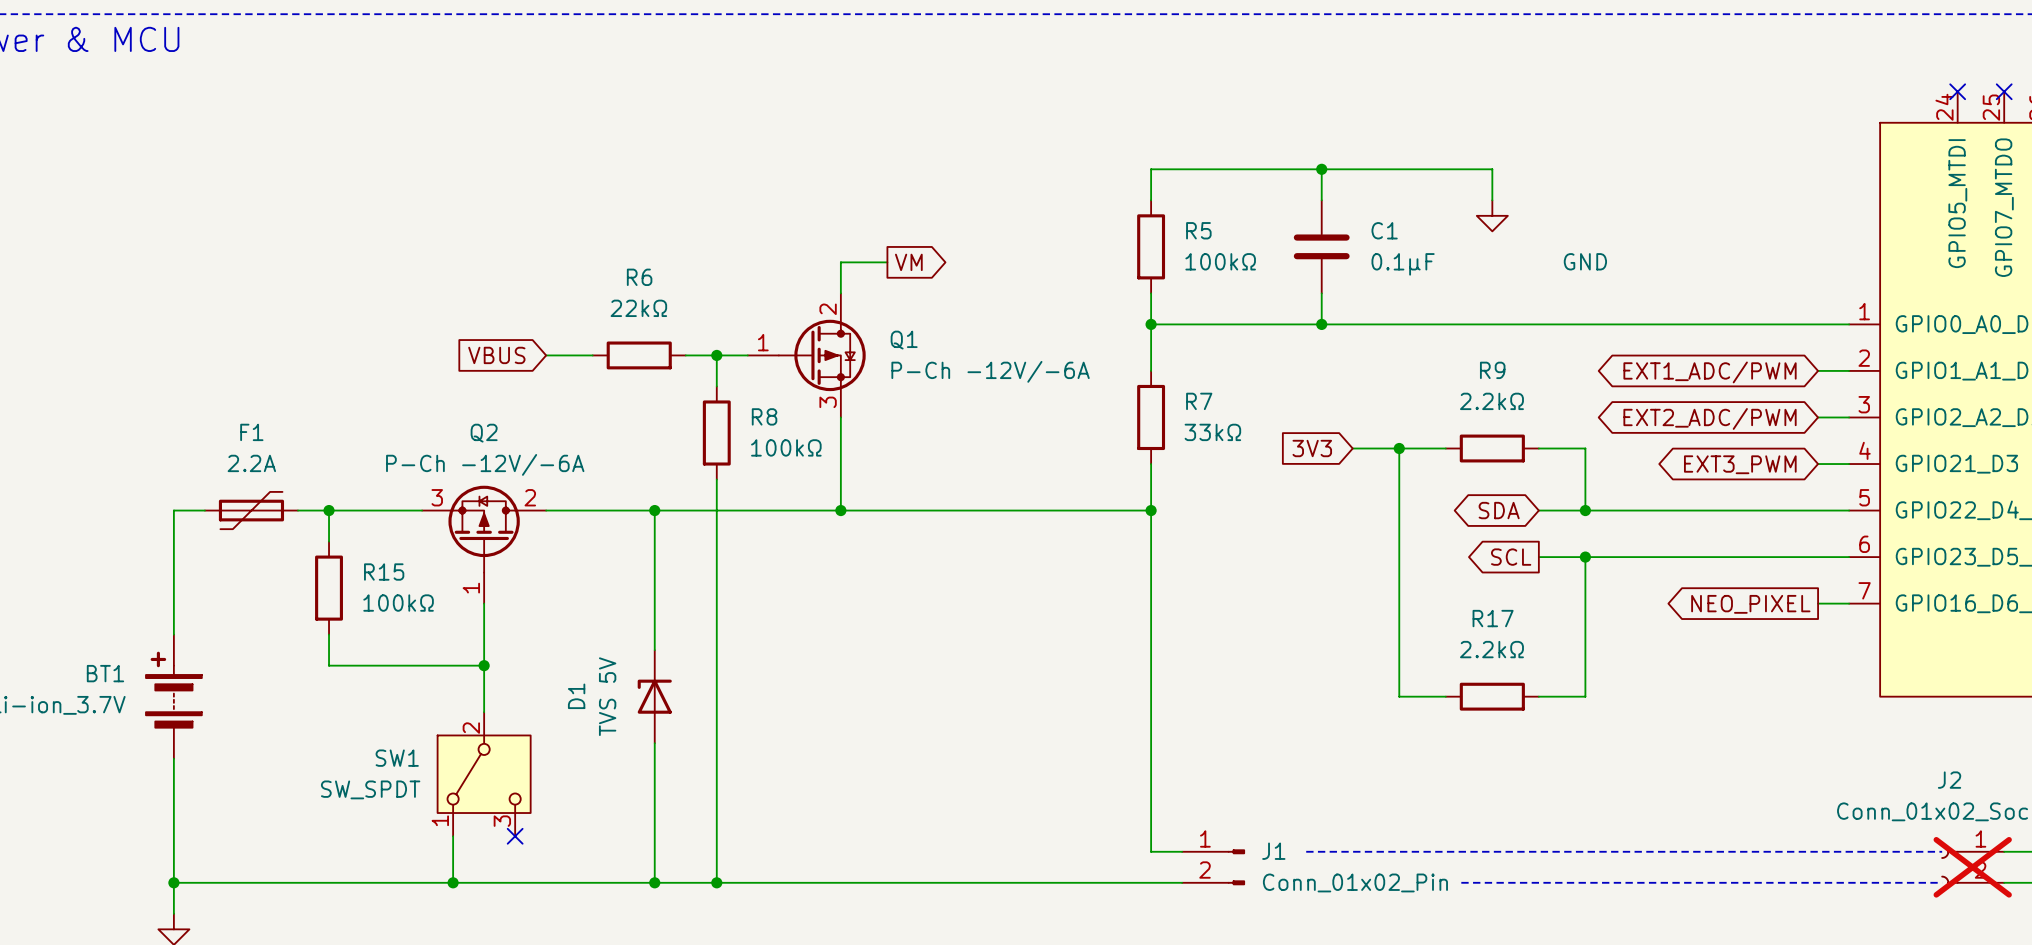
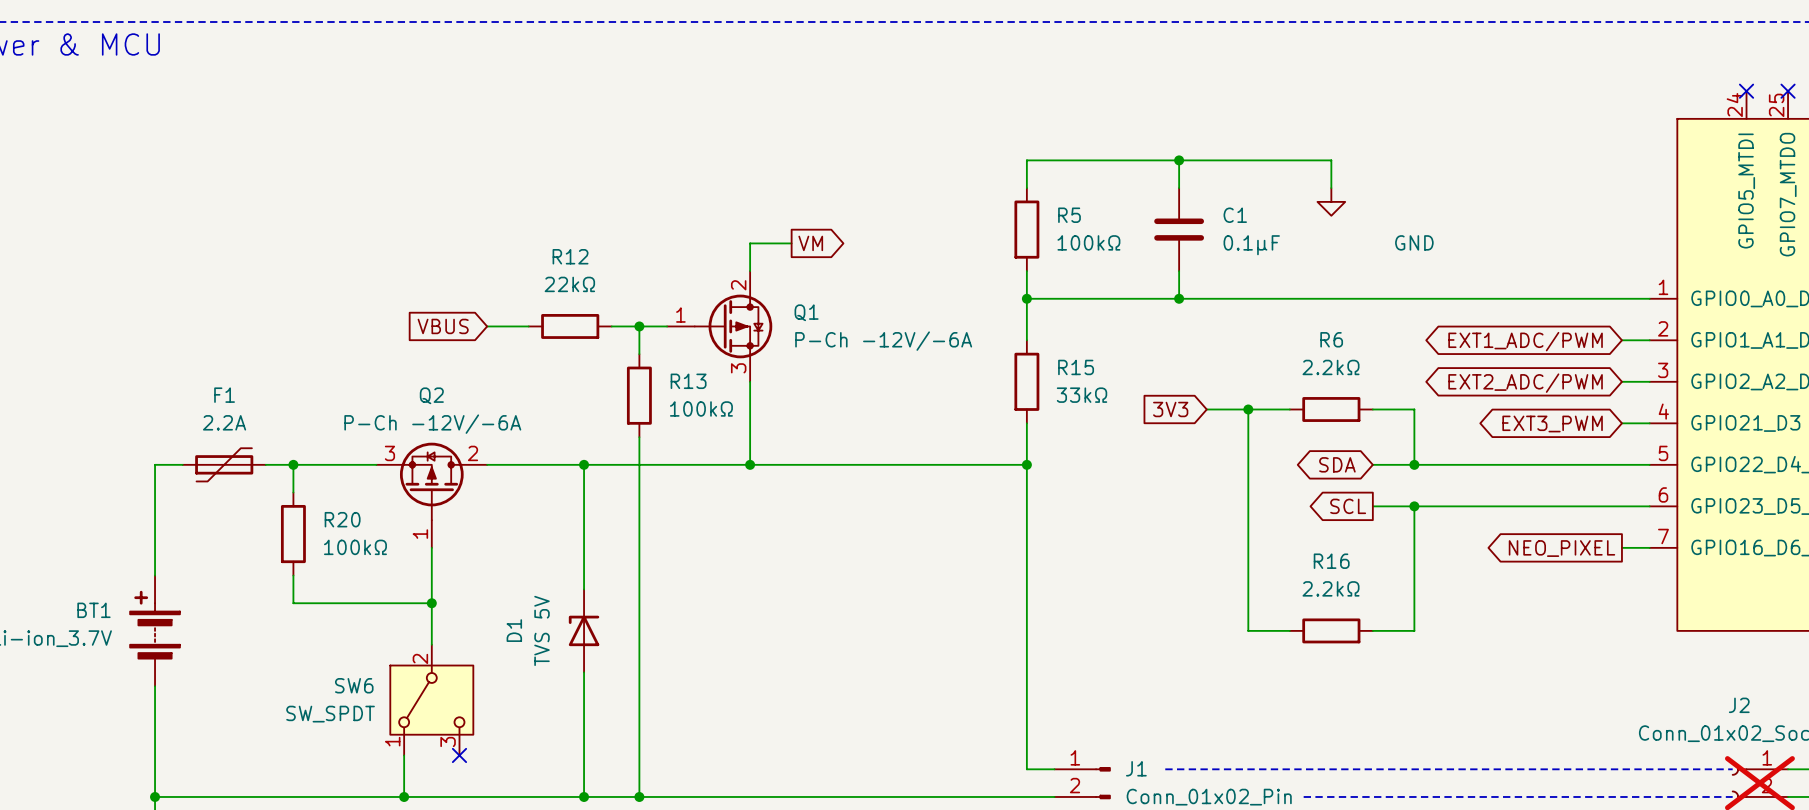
R6 name: R6 (639, 277) -> R12 (570, 256)
R9 name: R9 (1492, 370) -> R6 (1331, 339)
R7 name: R7 (1199, 401) -> R15 (1076, 367)
R8 name: R8 (764, 416) -> R13 (688, 381)
R15 name: R15 (384, 572) -> R20 (342, 519)
R17 name: R17 (1493, 618) -> R16 (1331, 561)
SW1 name: SW1 (397, 758) -> SW6 (354, 685)

